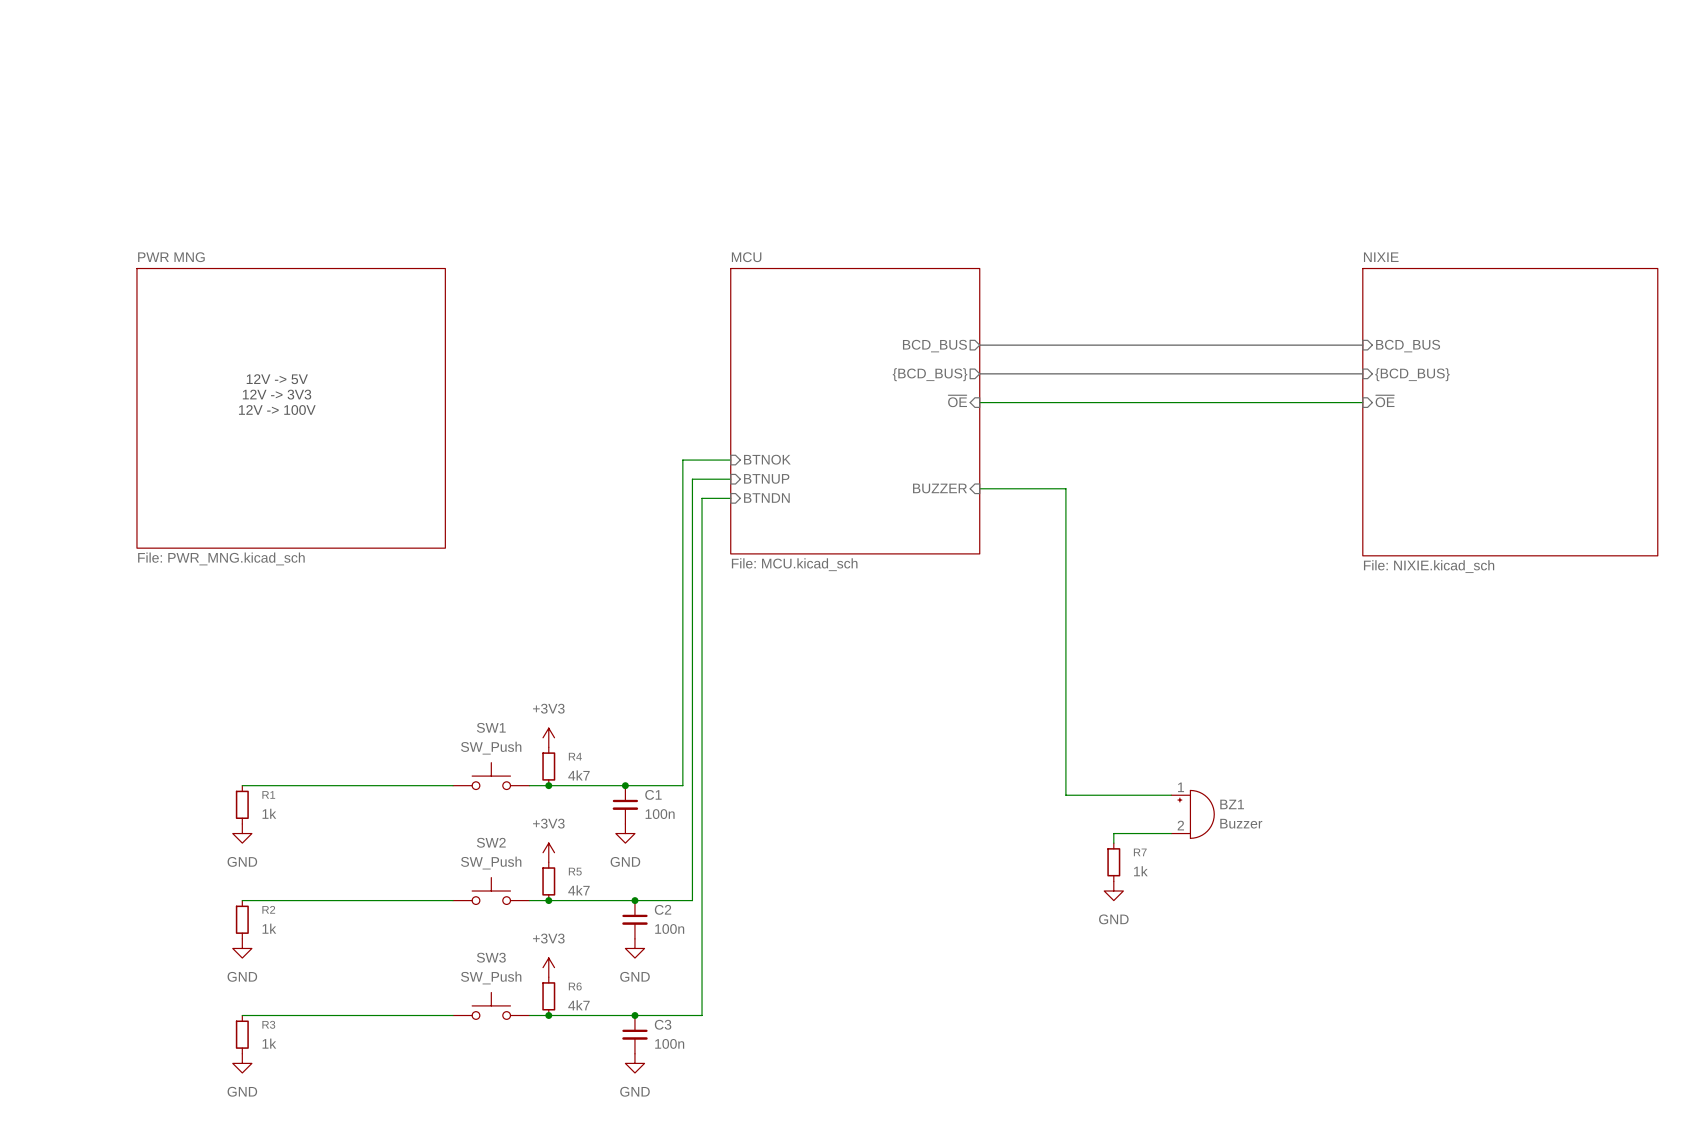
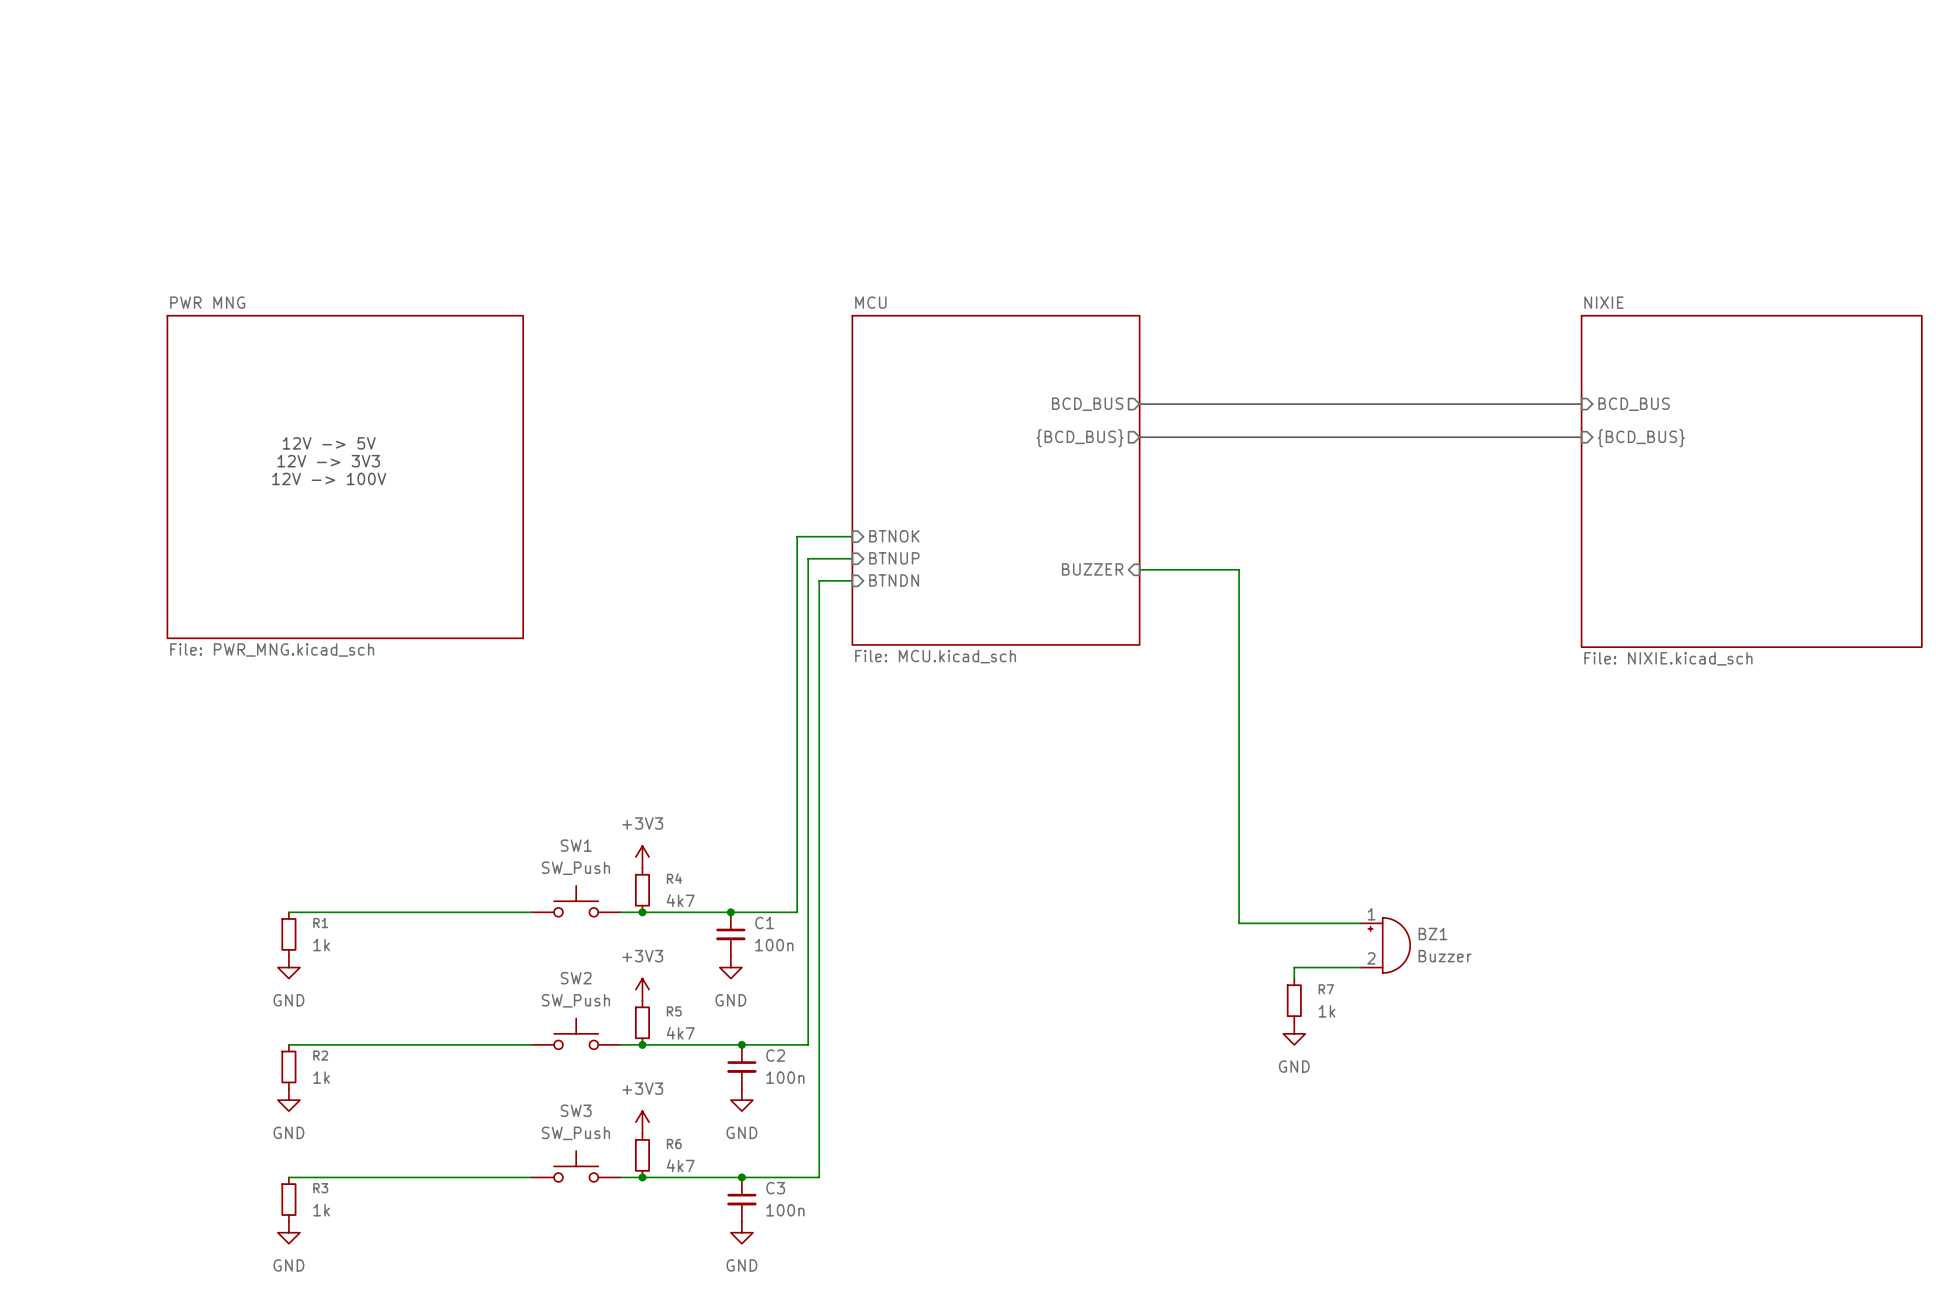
sheet pin: ~{OE} (957, 401) -> none
sheet pin: ~{OE} (1385, 401) -> none
wire: (979, 402) (1362, 402) -> none

